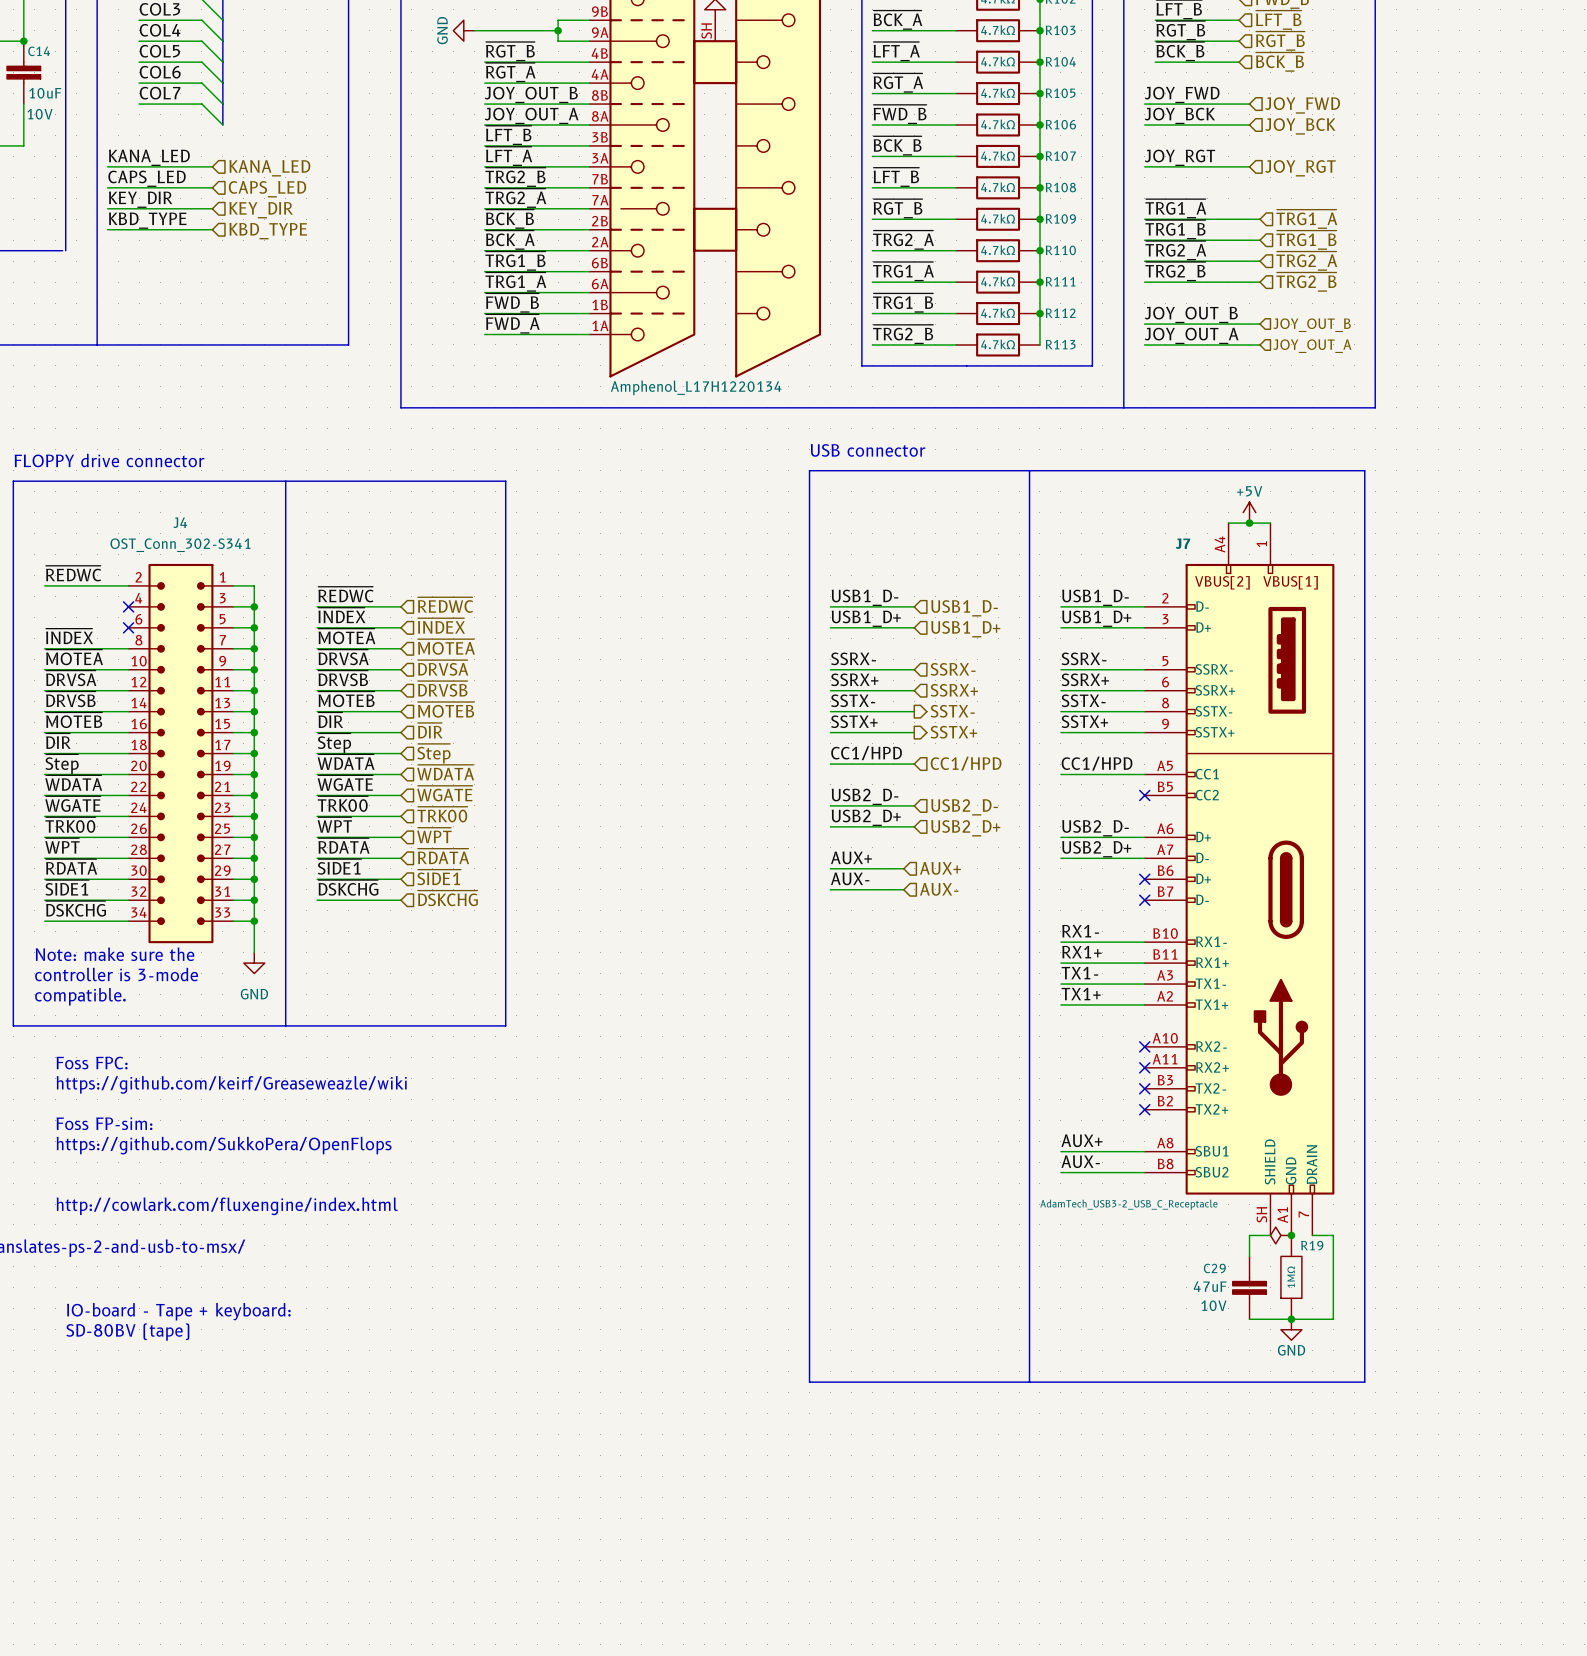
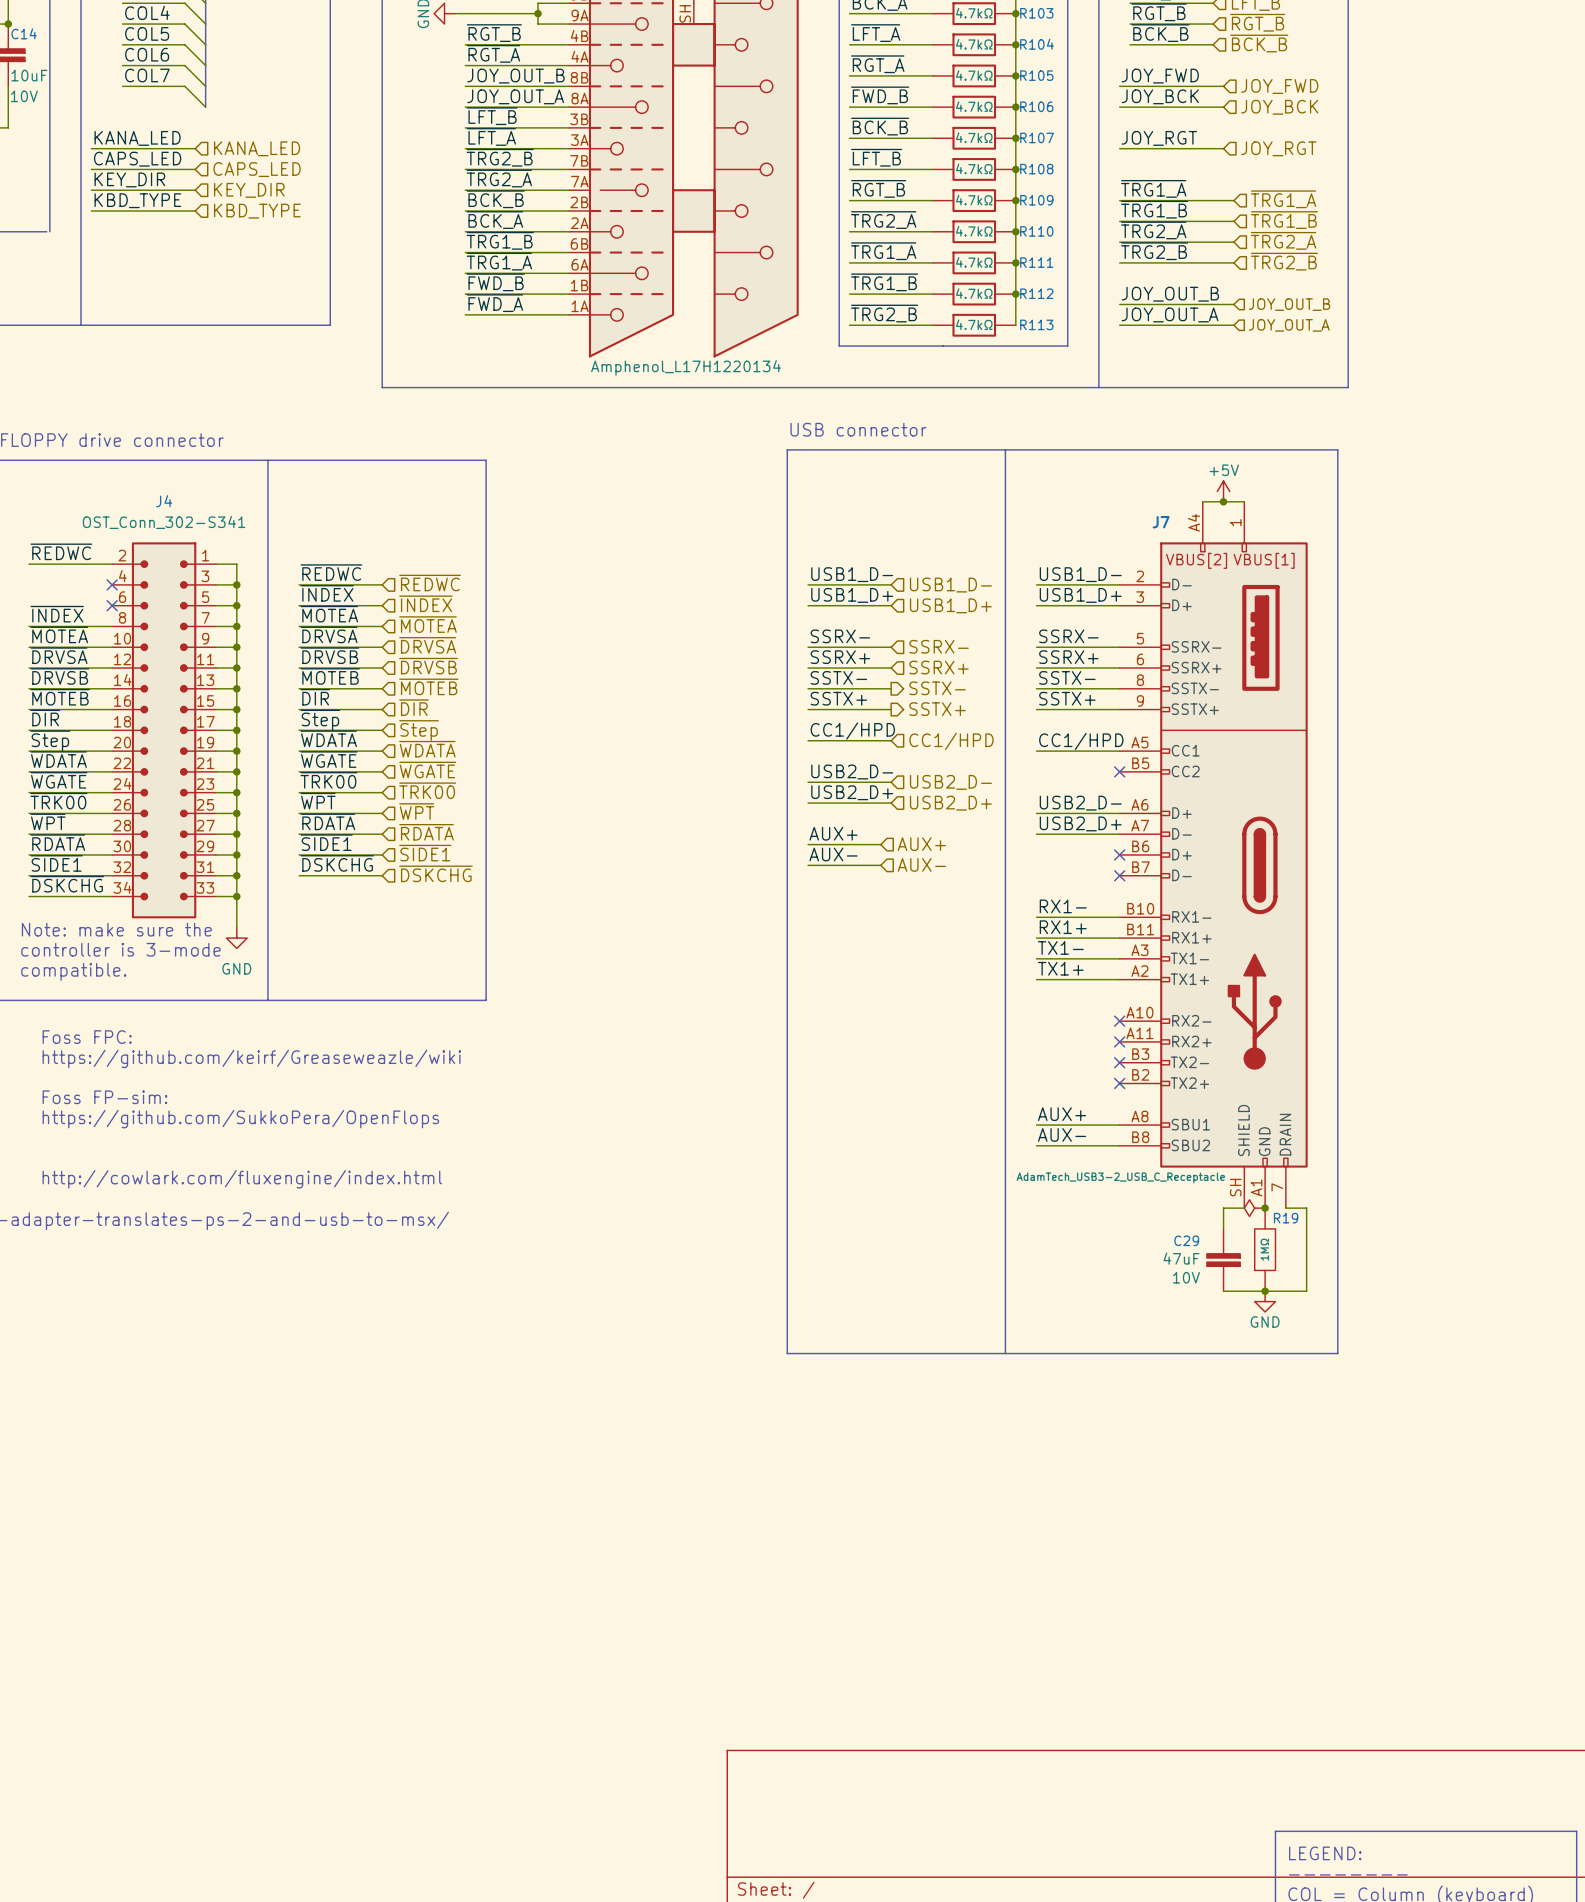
text: IO-board - Tape + keyboard: (178, 1311) -> none
text: SD-80BV (tape) (127, 1332) -> none

